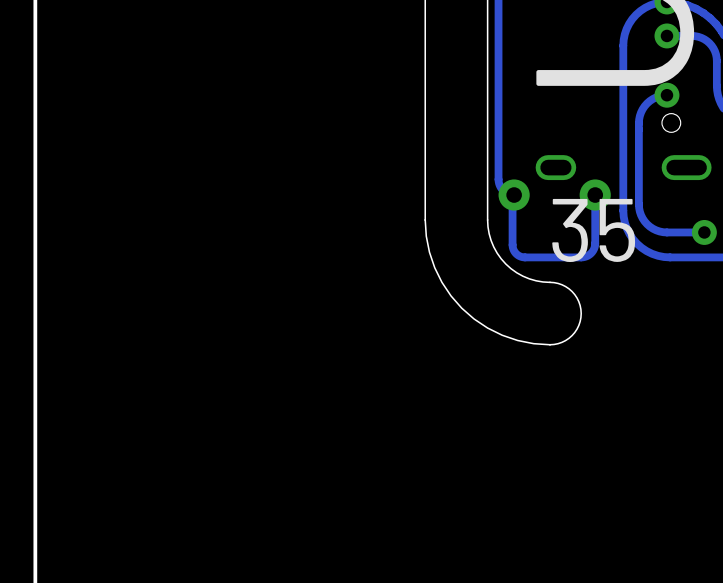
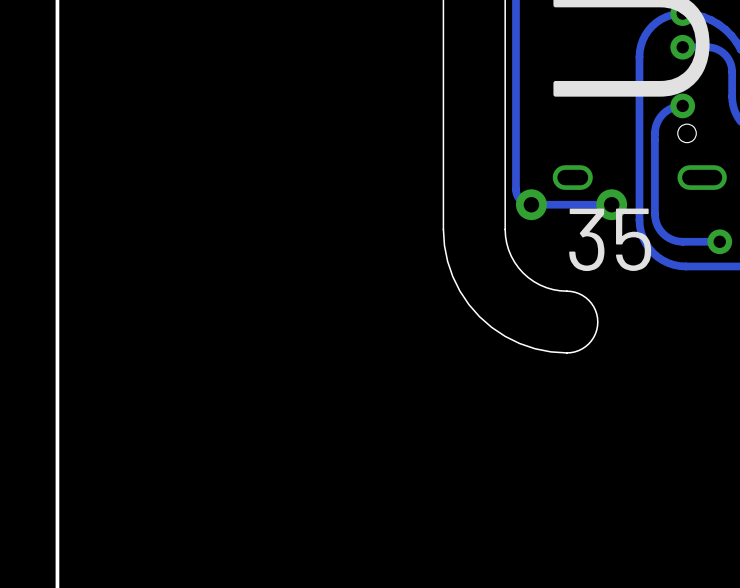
track: (595, 195) (594, 247) (589, 254) (581, 257) (523, 257) (516, 253) (512, 244) (512, 196) (514, 195) -> (611, 204) (531, 204)

